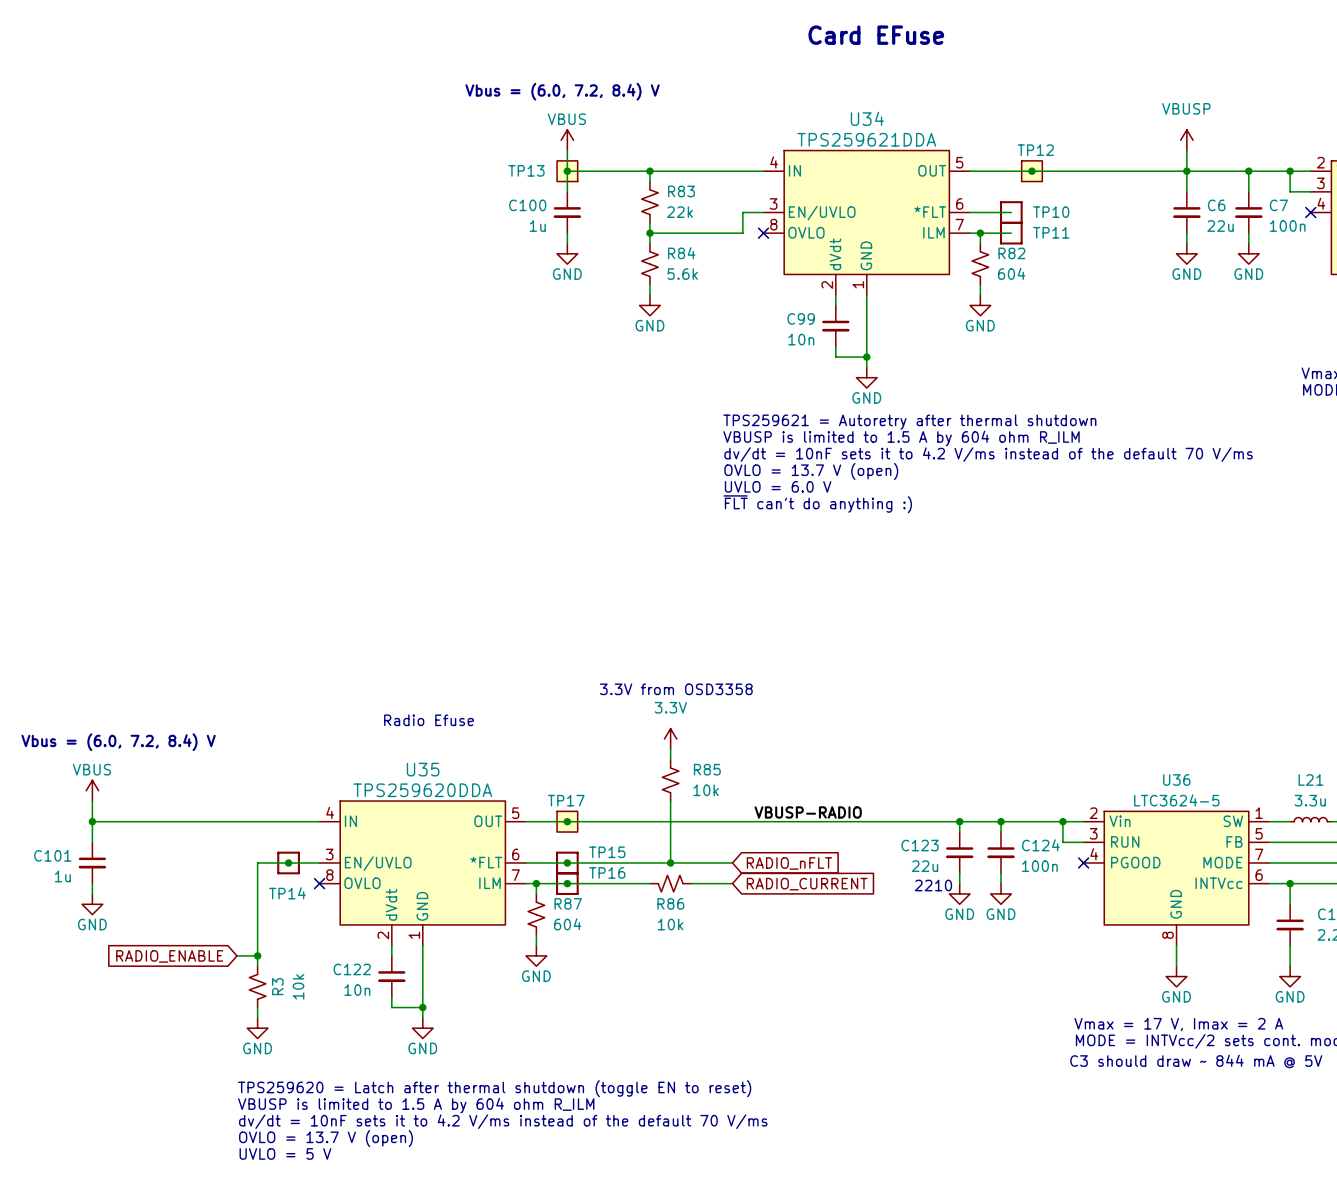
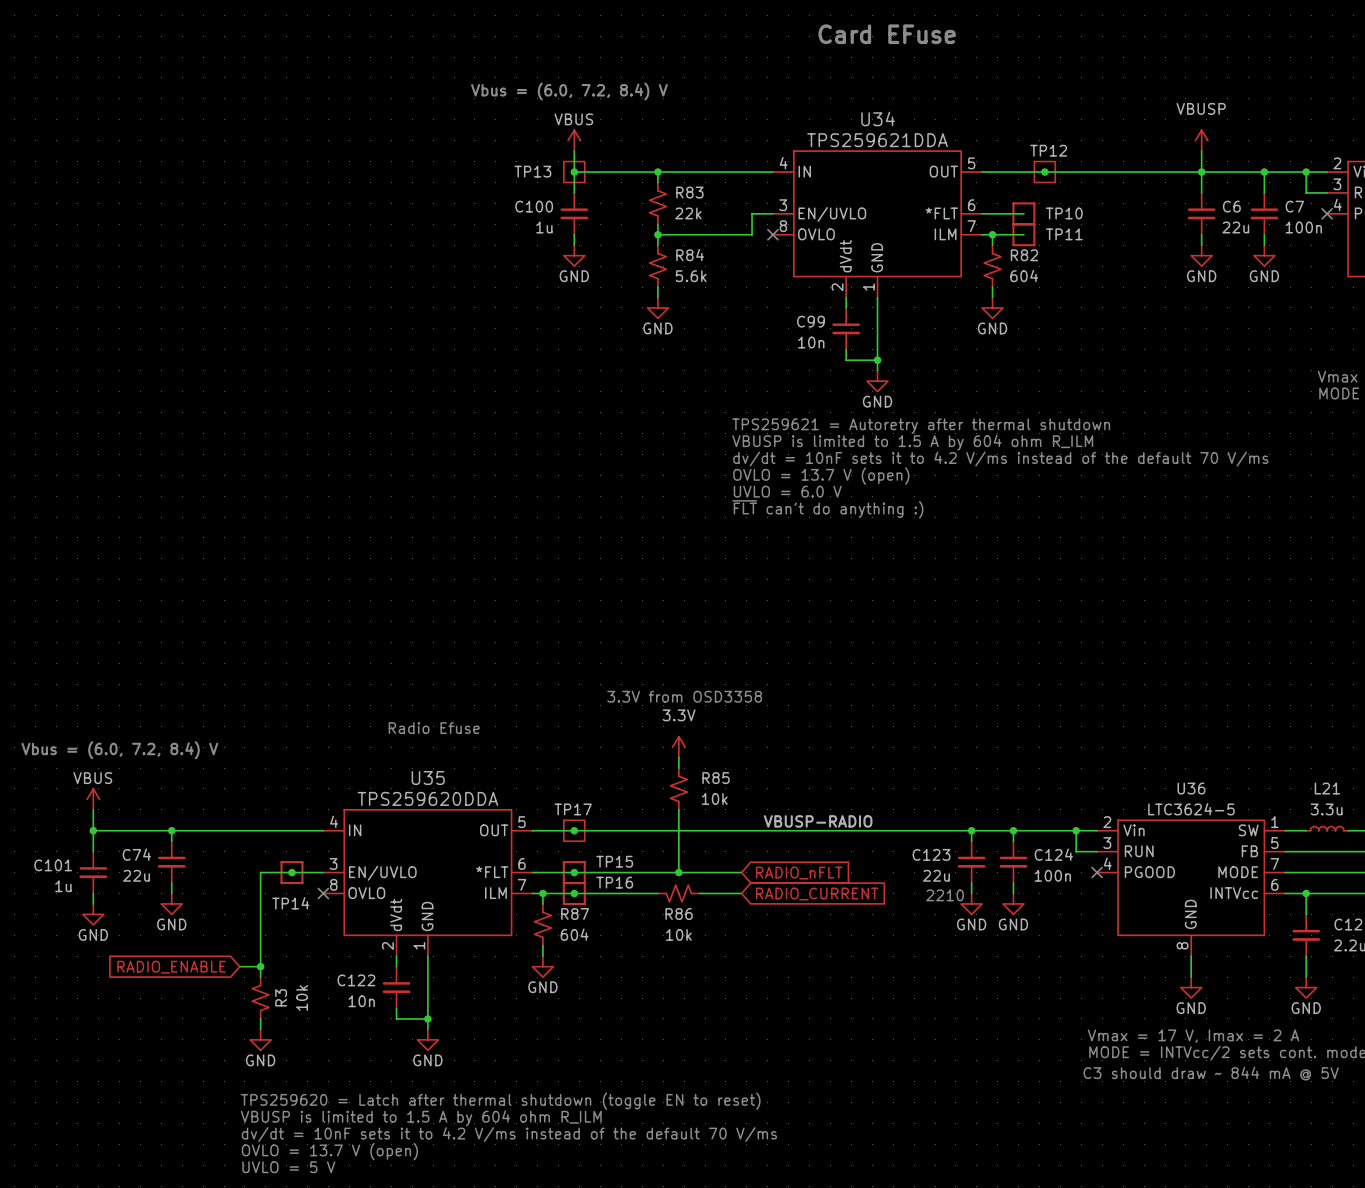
wire: none -> (171, 830) (171, 841)
junction: none -> (171, 830)
C74: none -> 22u (171, 862)
wire: none -> (171, 883) (171, 893)
power symbol: none -> GND (171, 903)

